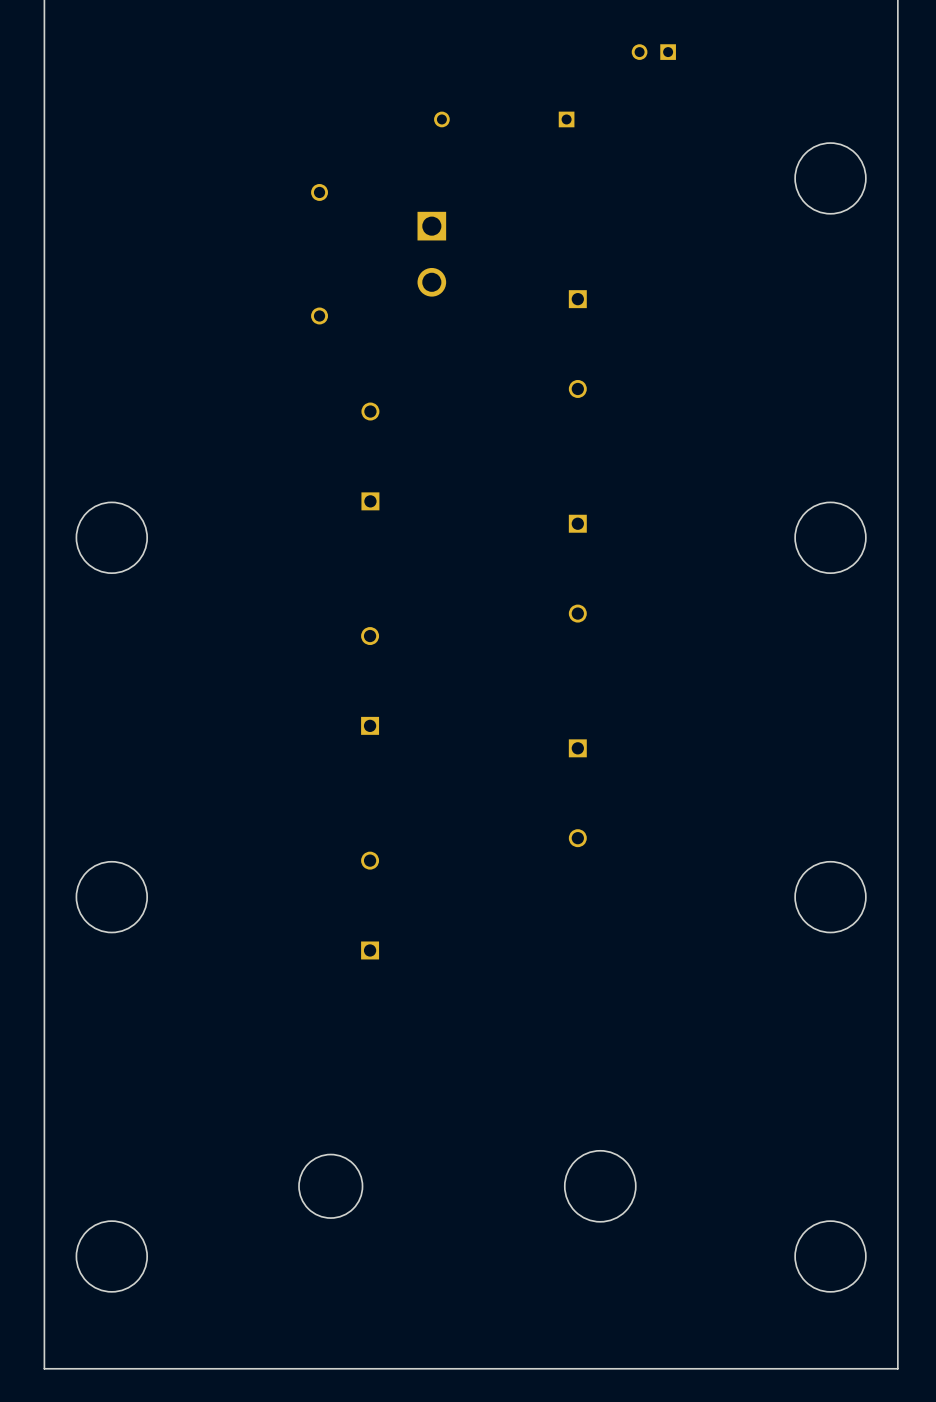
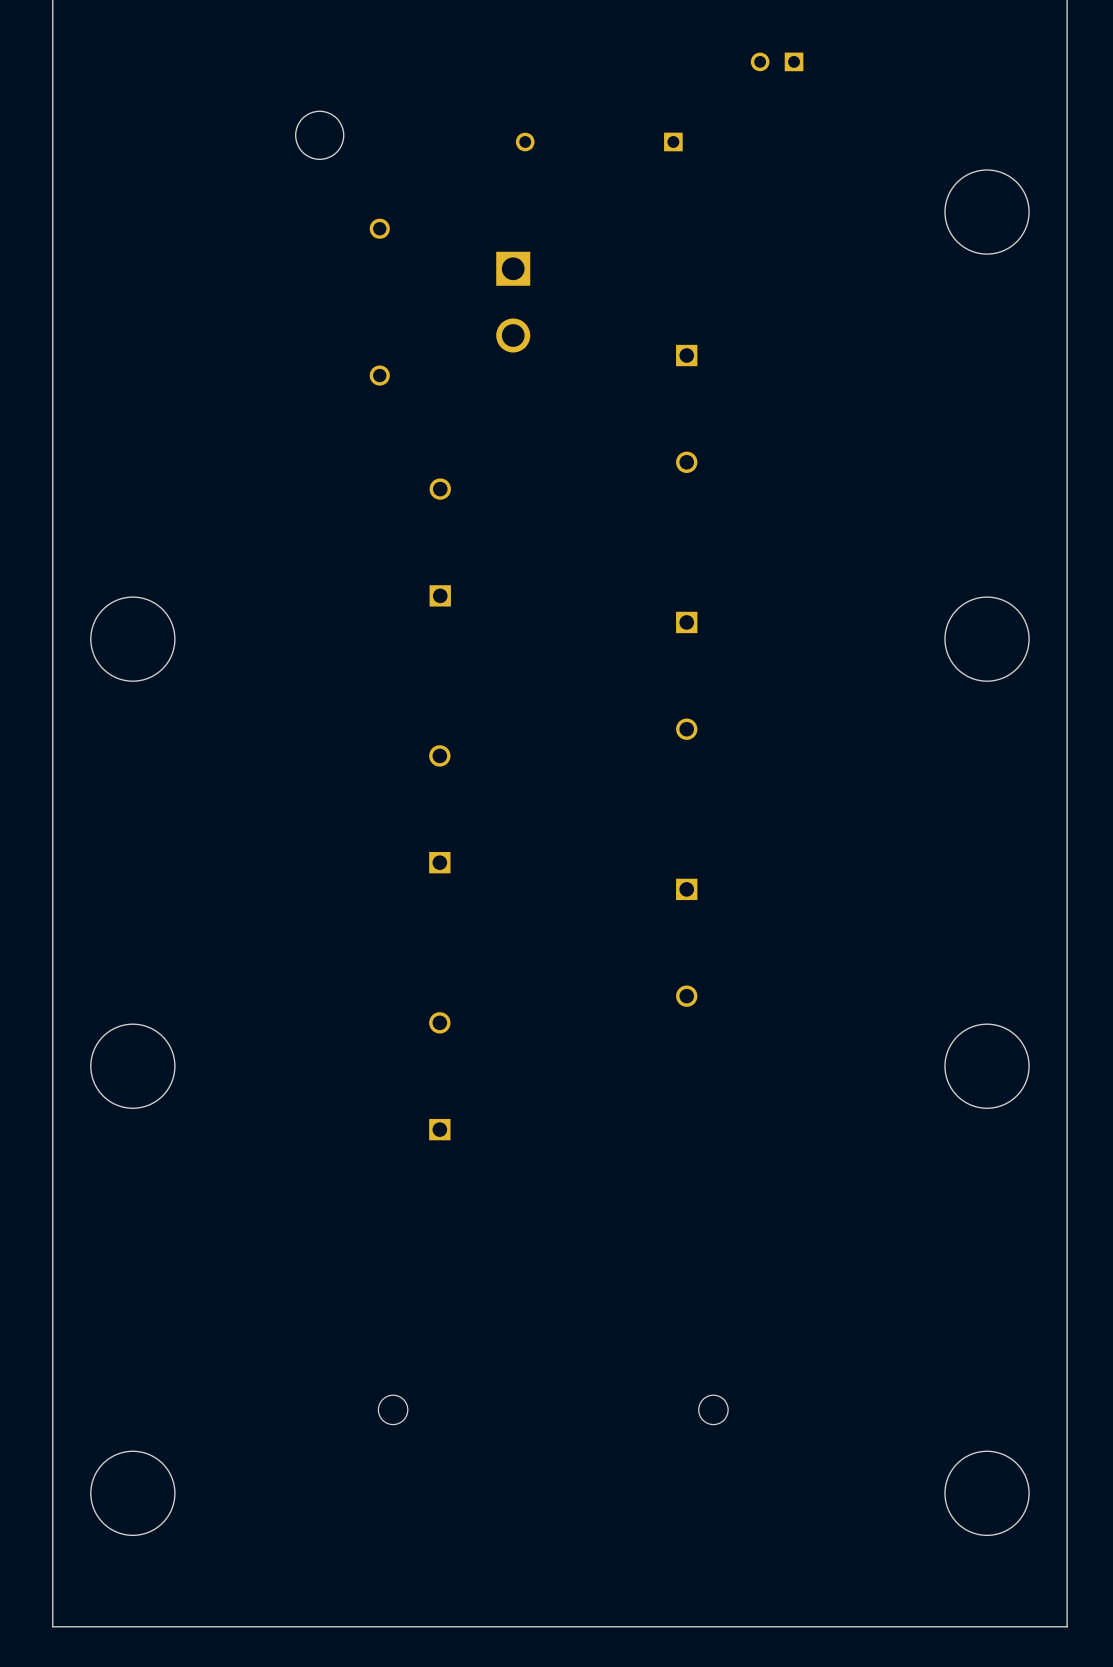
round board edge: none -> [295, 110, 345, 161]
round board edge size: [564, 1150, 637, 1223] -> [698, 1394, 729, 1425]
round board edge size: [298, 1154, 363, 1219] -> [378, 1394, 409, 1425]

